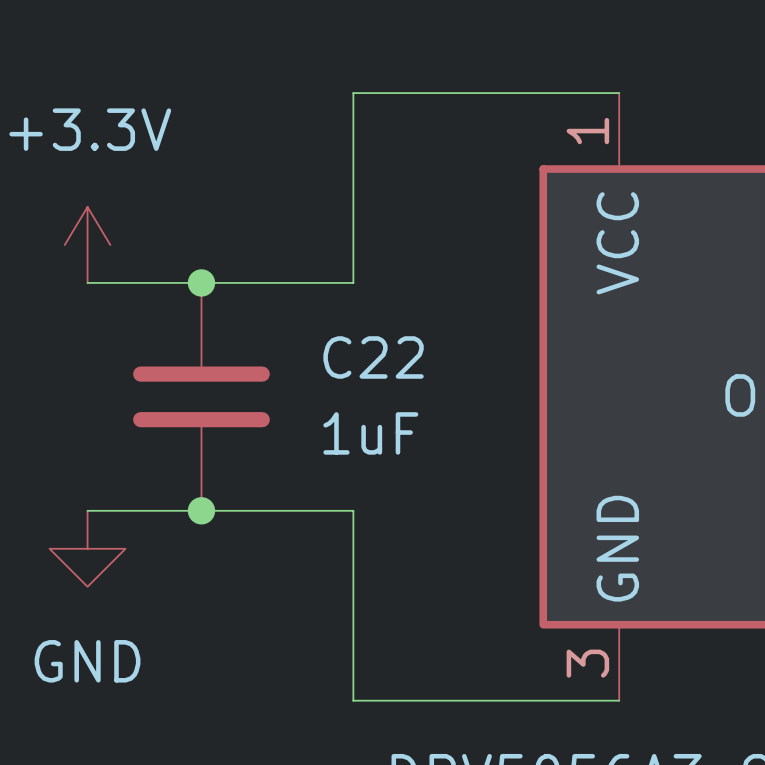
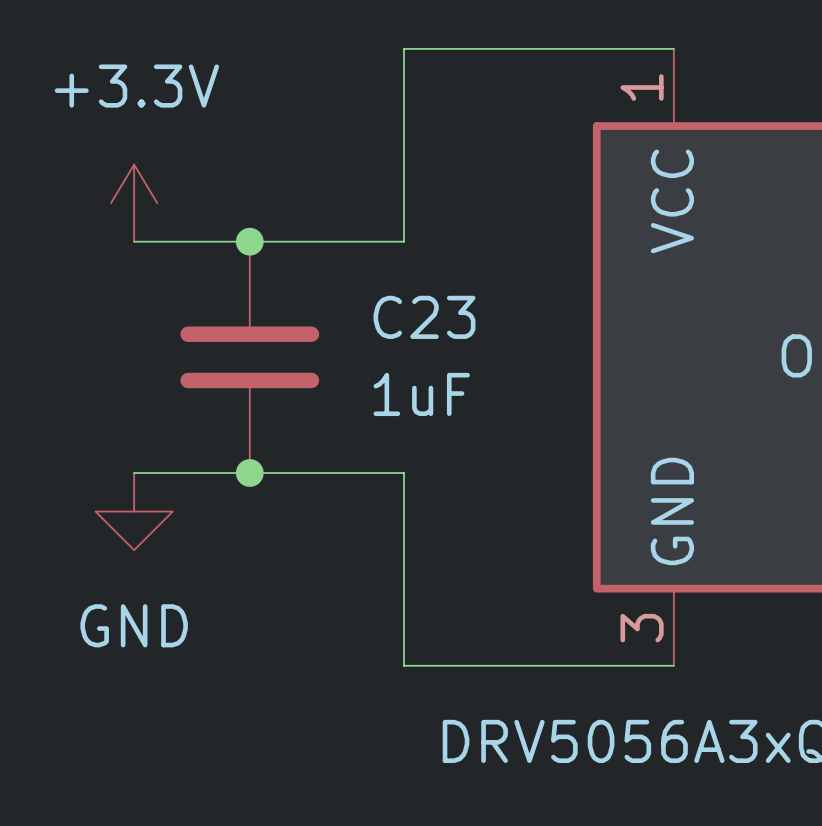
C22 name: C22 (373, 357) -> C23 (424, 317)

